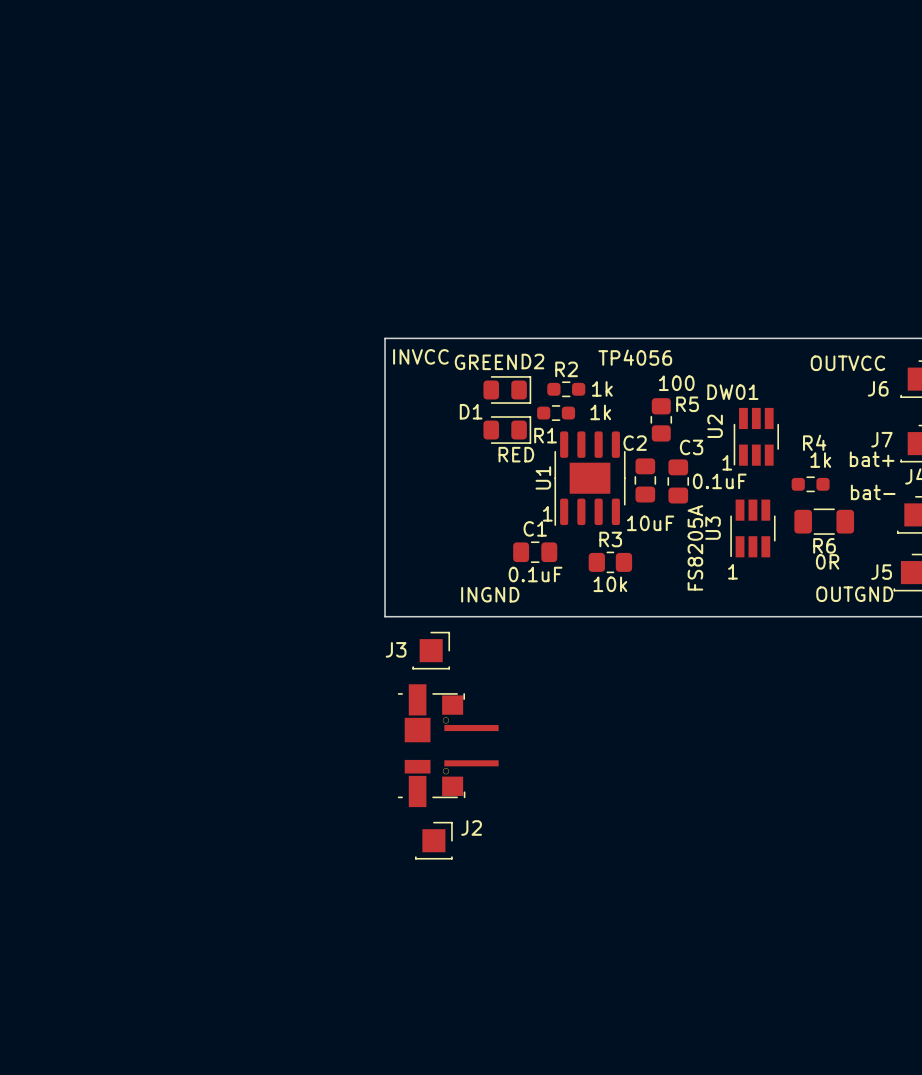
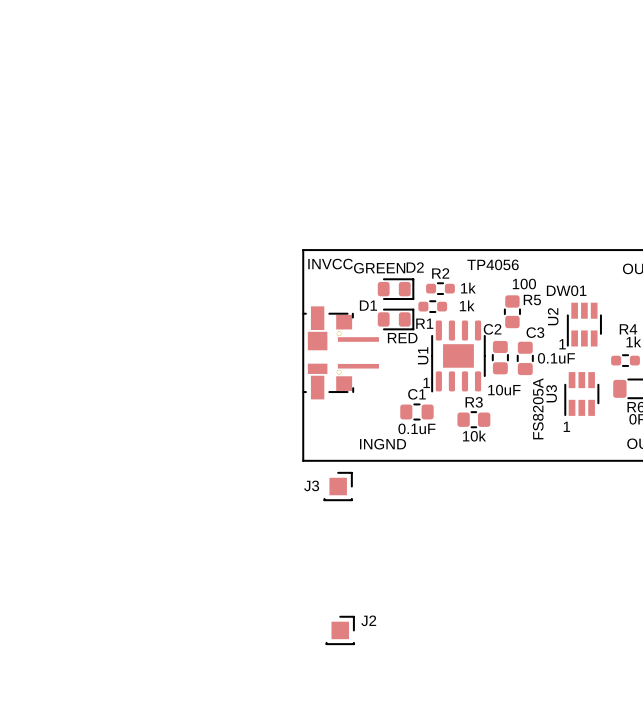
part position: (448, 745) -> (340, 352)

